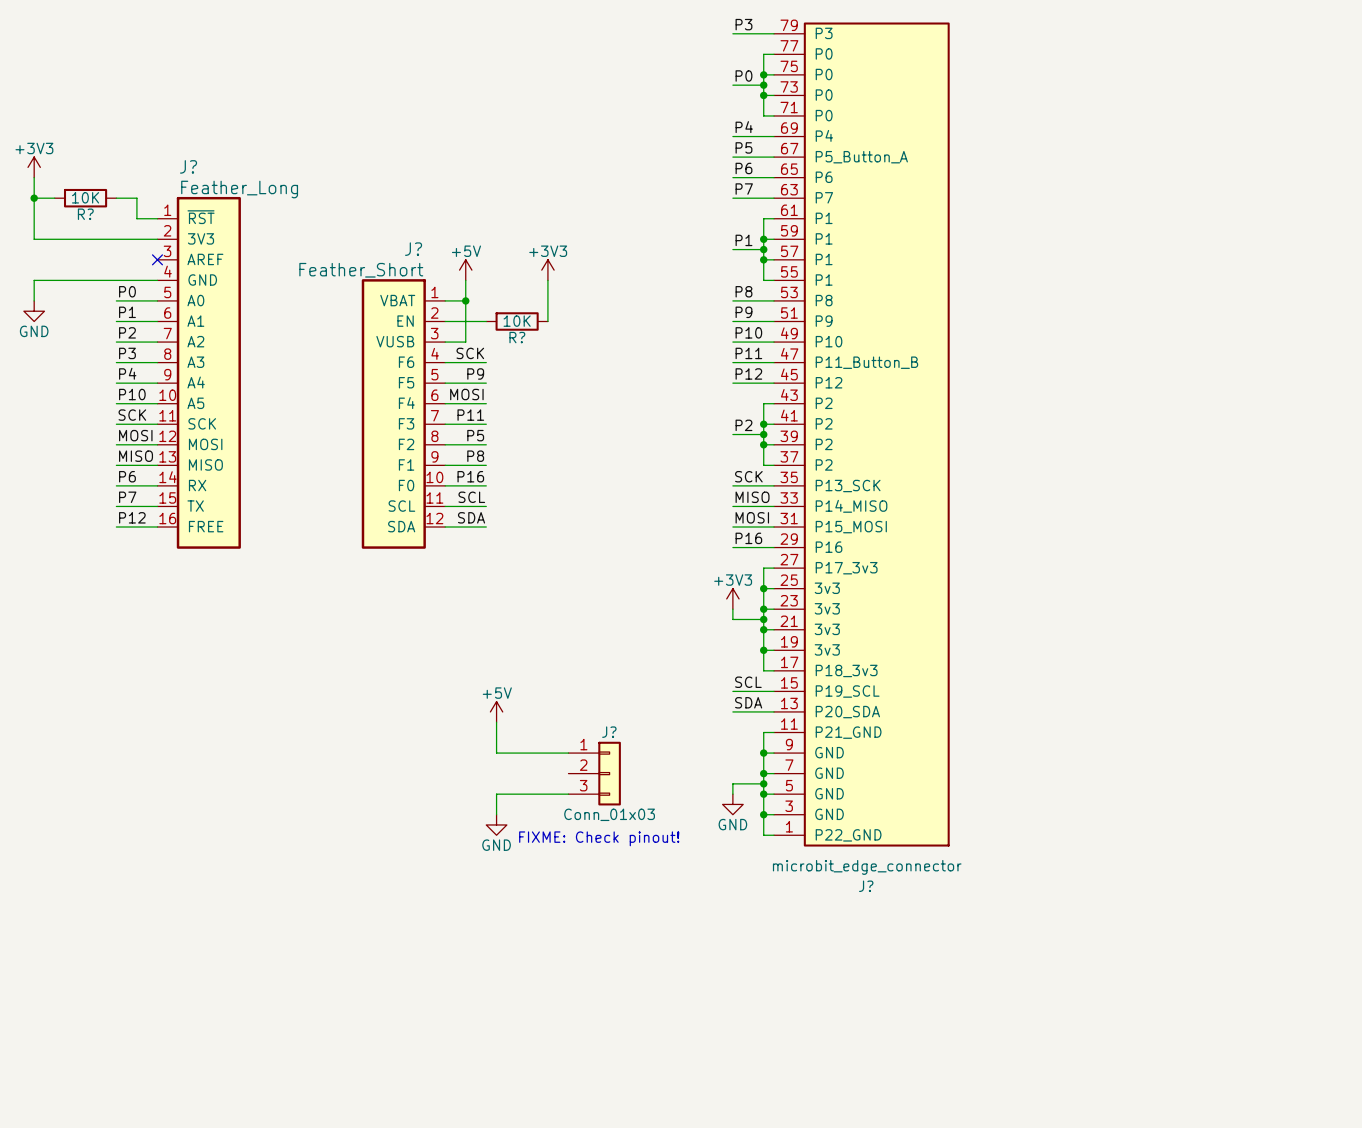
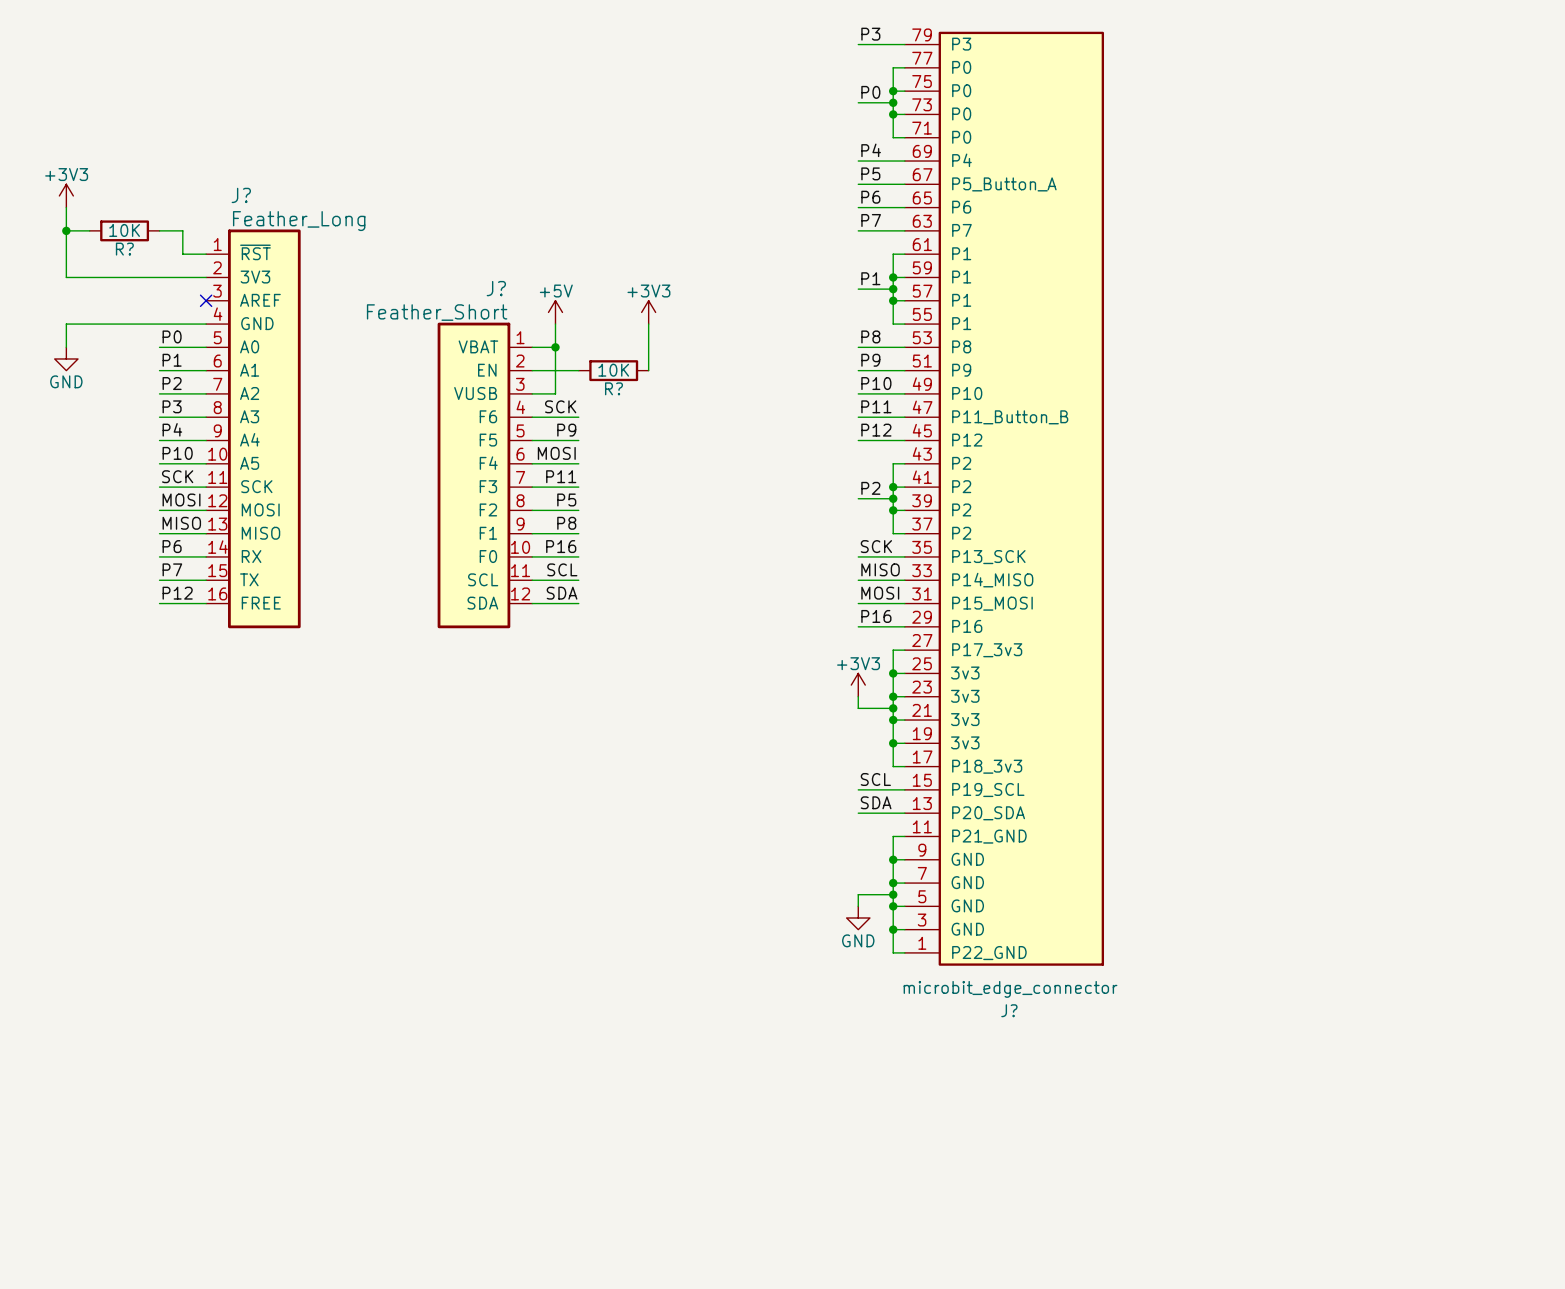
power symbol: +5V (496, 711) -> none
wire: (496, 722) (496, 753) (568, 753) -> none
J?: Conn_01x03 (594, 773) -> none
wire: (568, 794) (496, 794) (496, 814) -> none
power symbol: GND (496, 824) -> none
text: FIXME: Check pinout! (599, 838) -> none

